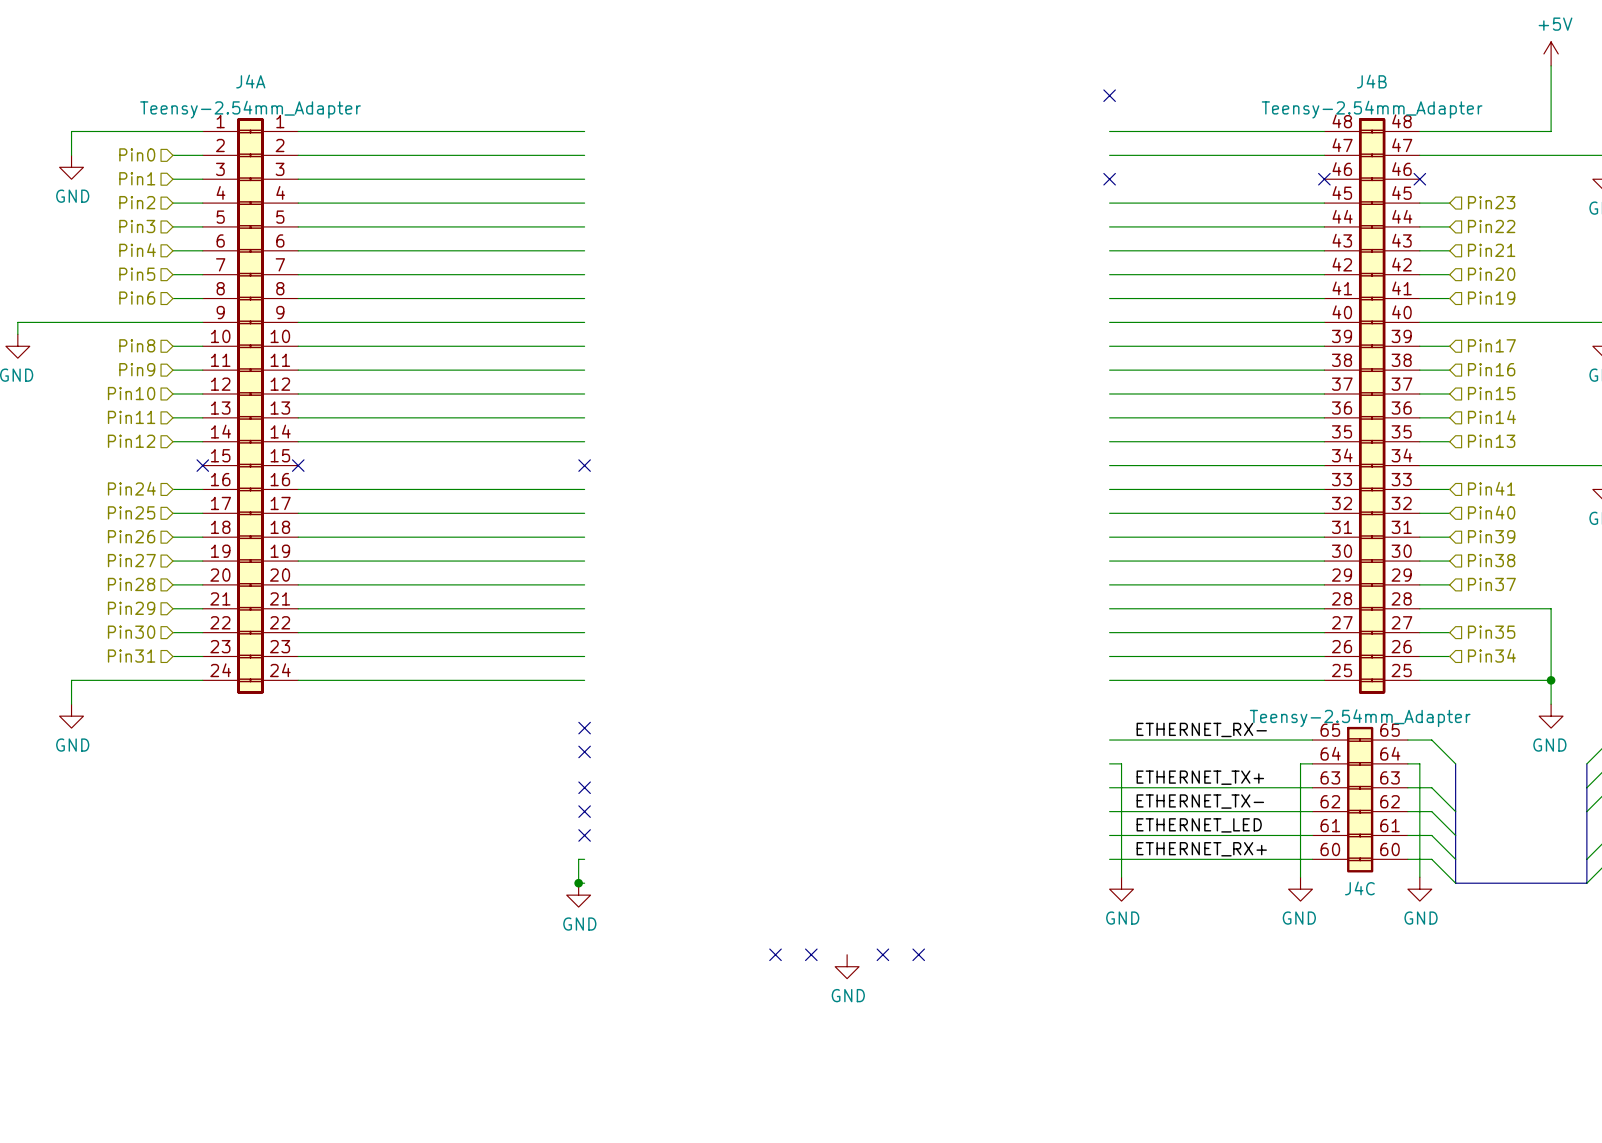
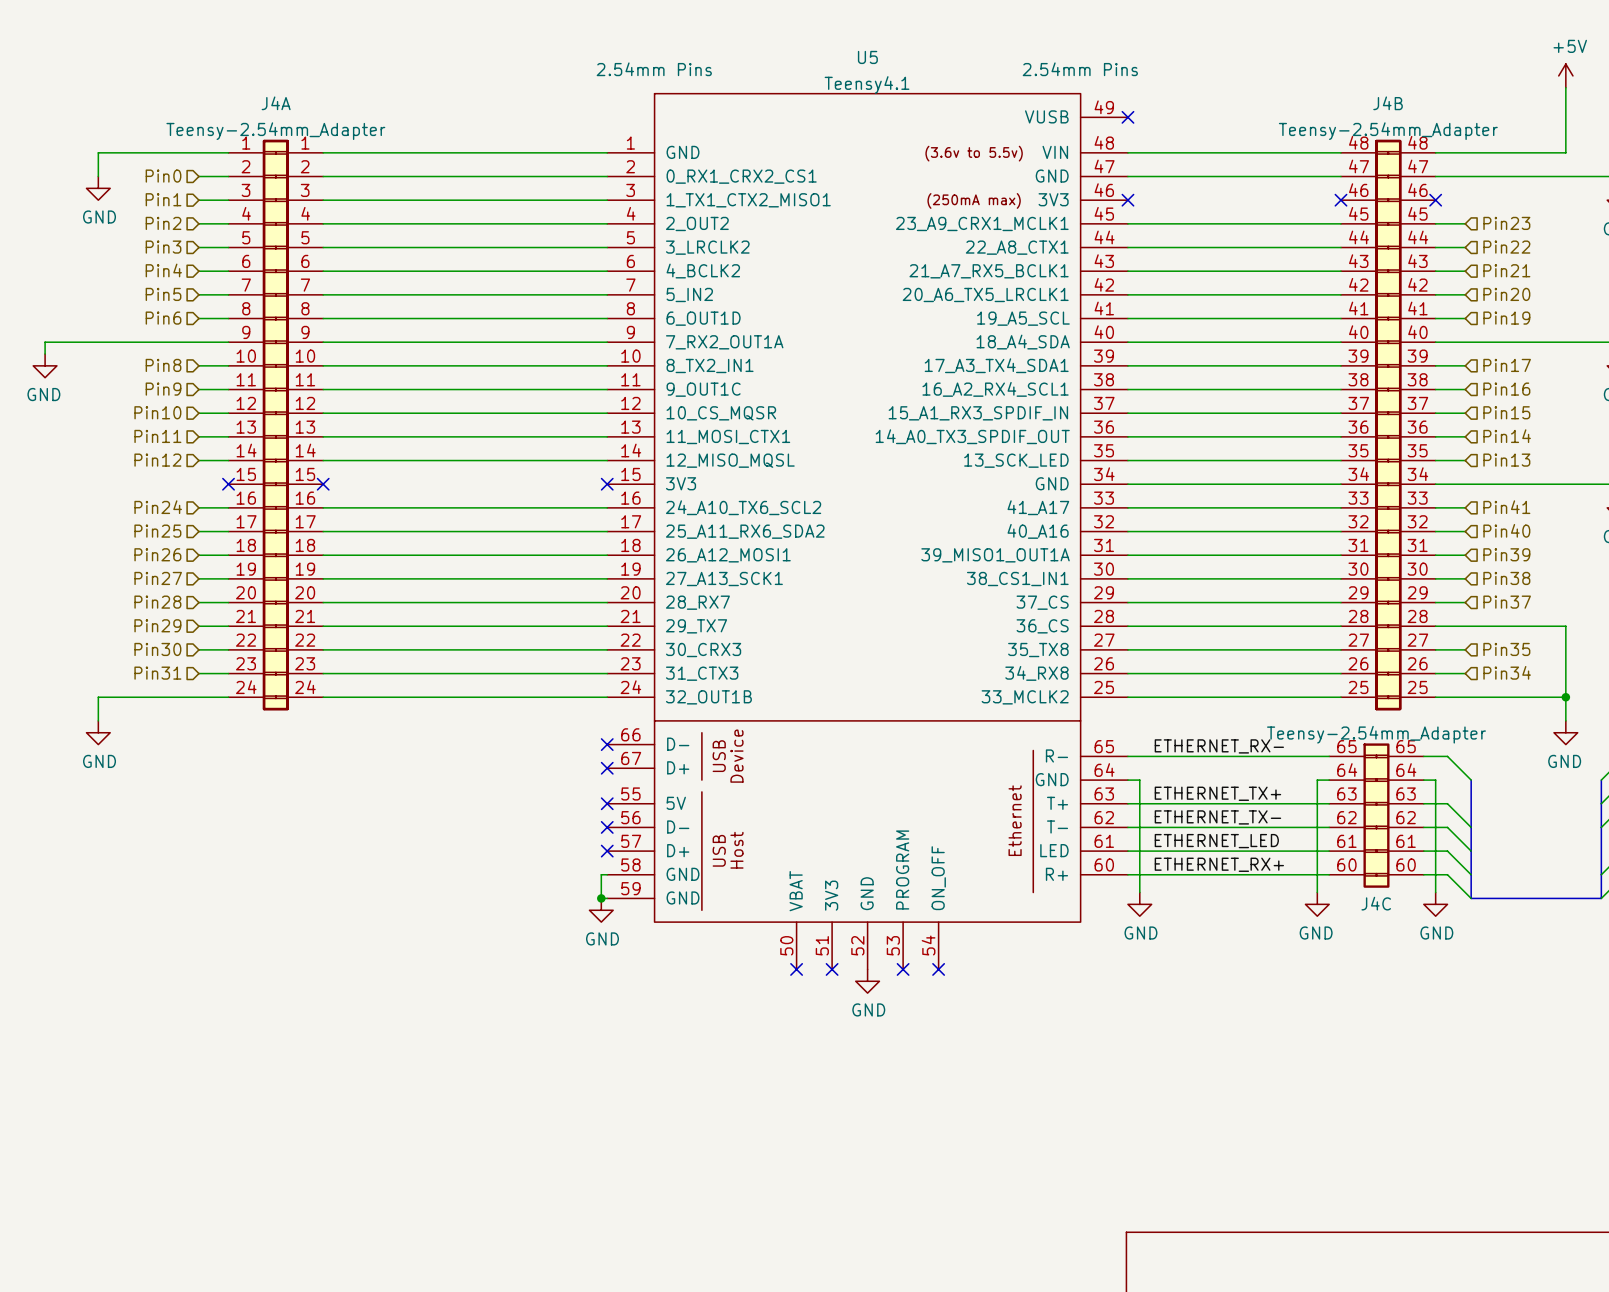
U5: none -> Teensy4.1 (867, 531)

